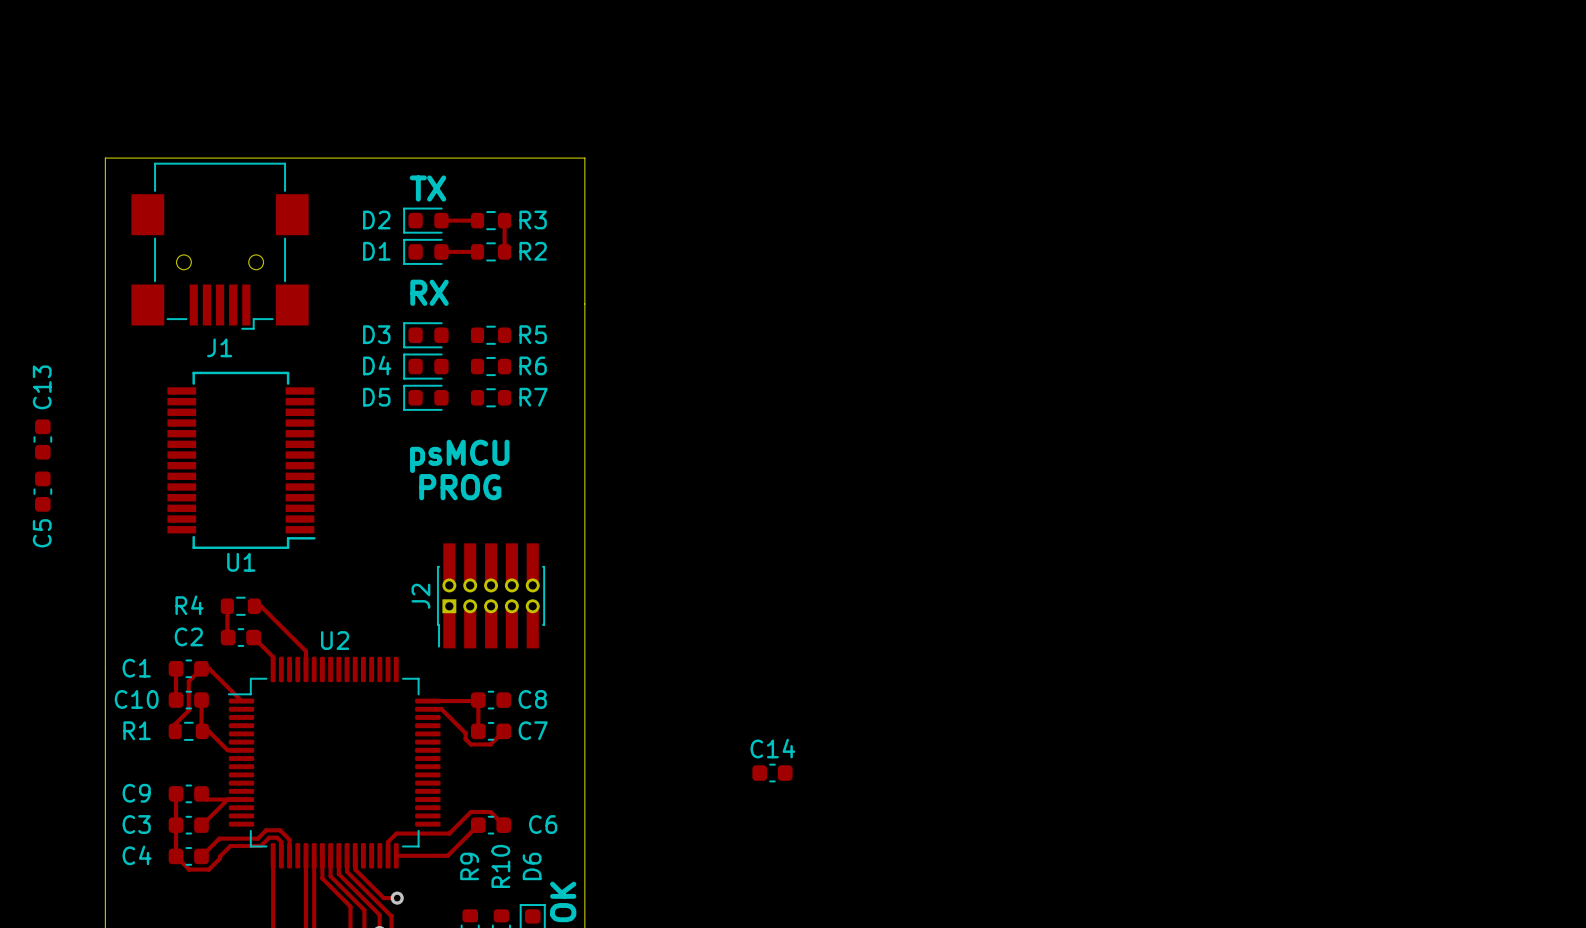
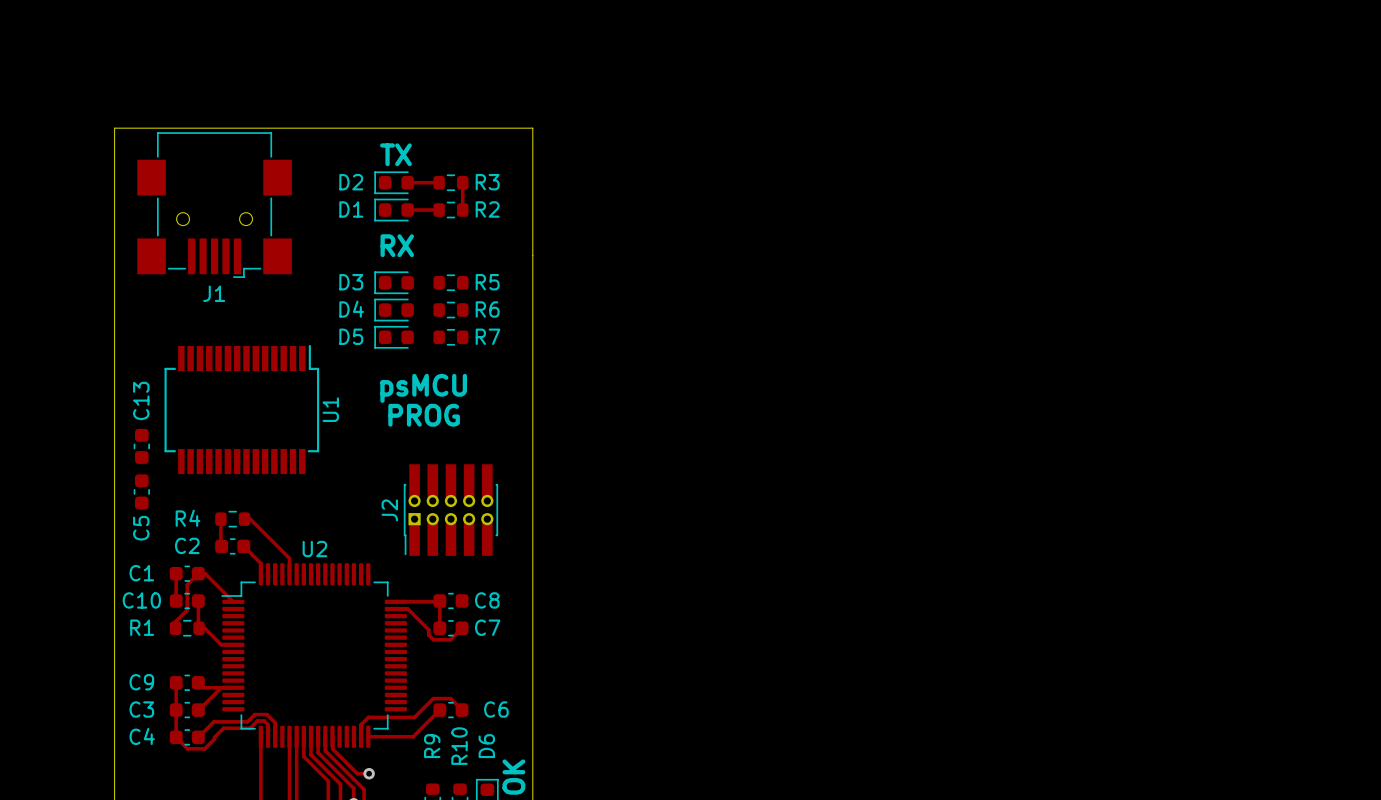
C13 position: (42, 439) -> (141, 446)
U1 rotation: 0° (241, 460) -> 90° counterclockwise (241, 409)
C5 position: (42, 491) -> (141, 491)
C14: (772, 773) -> none

